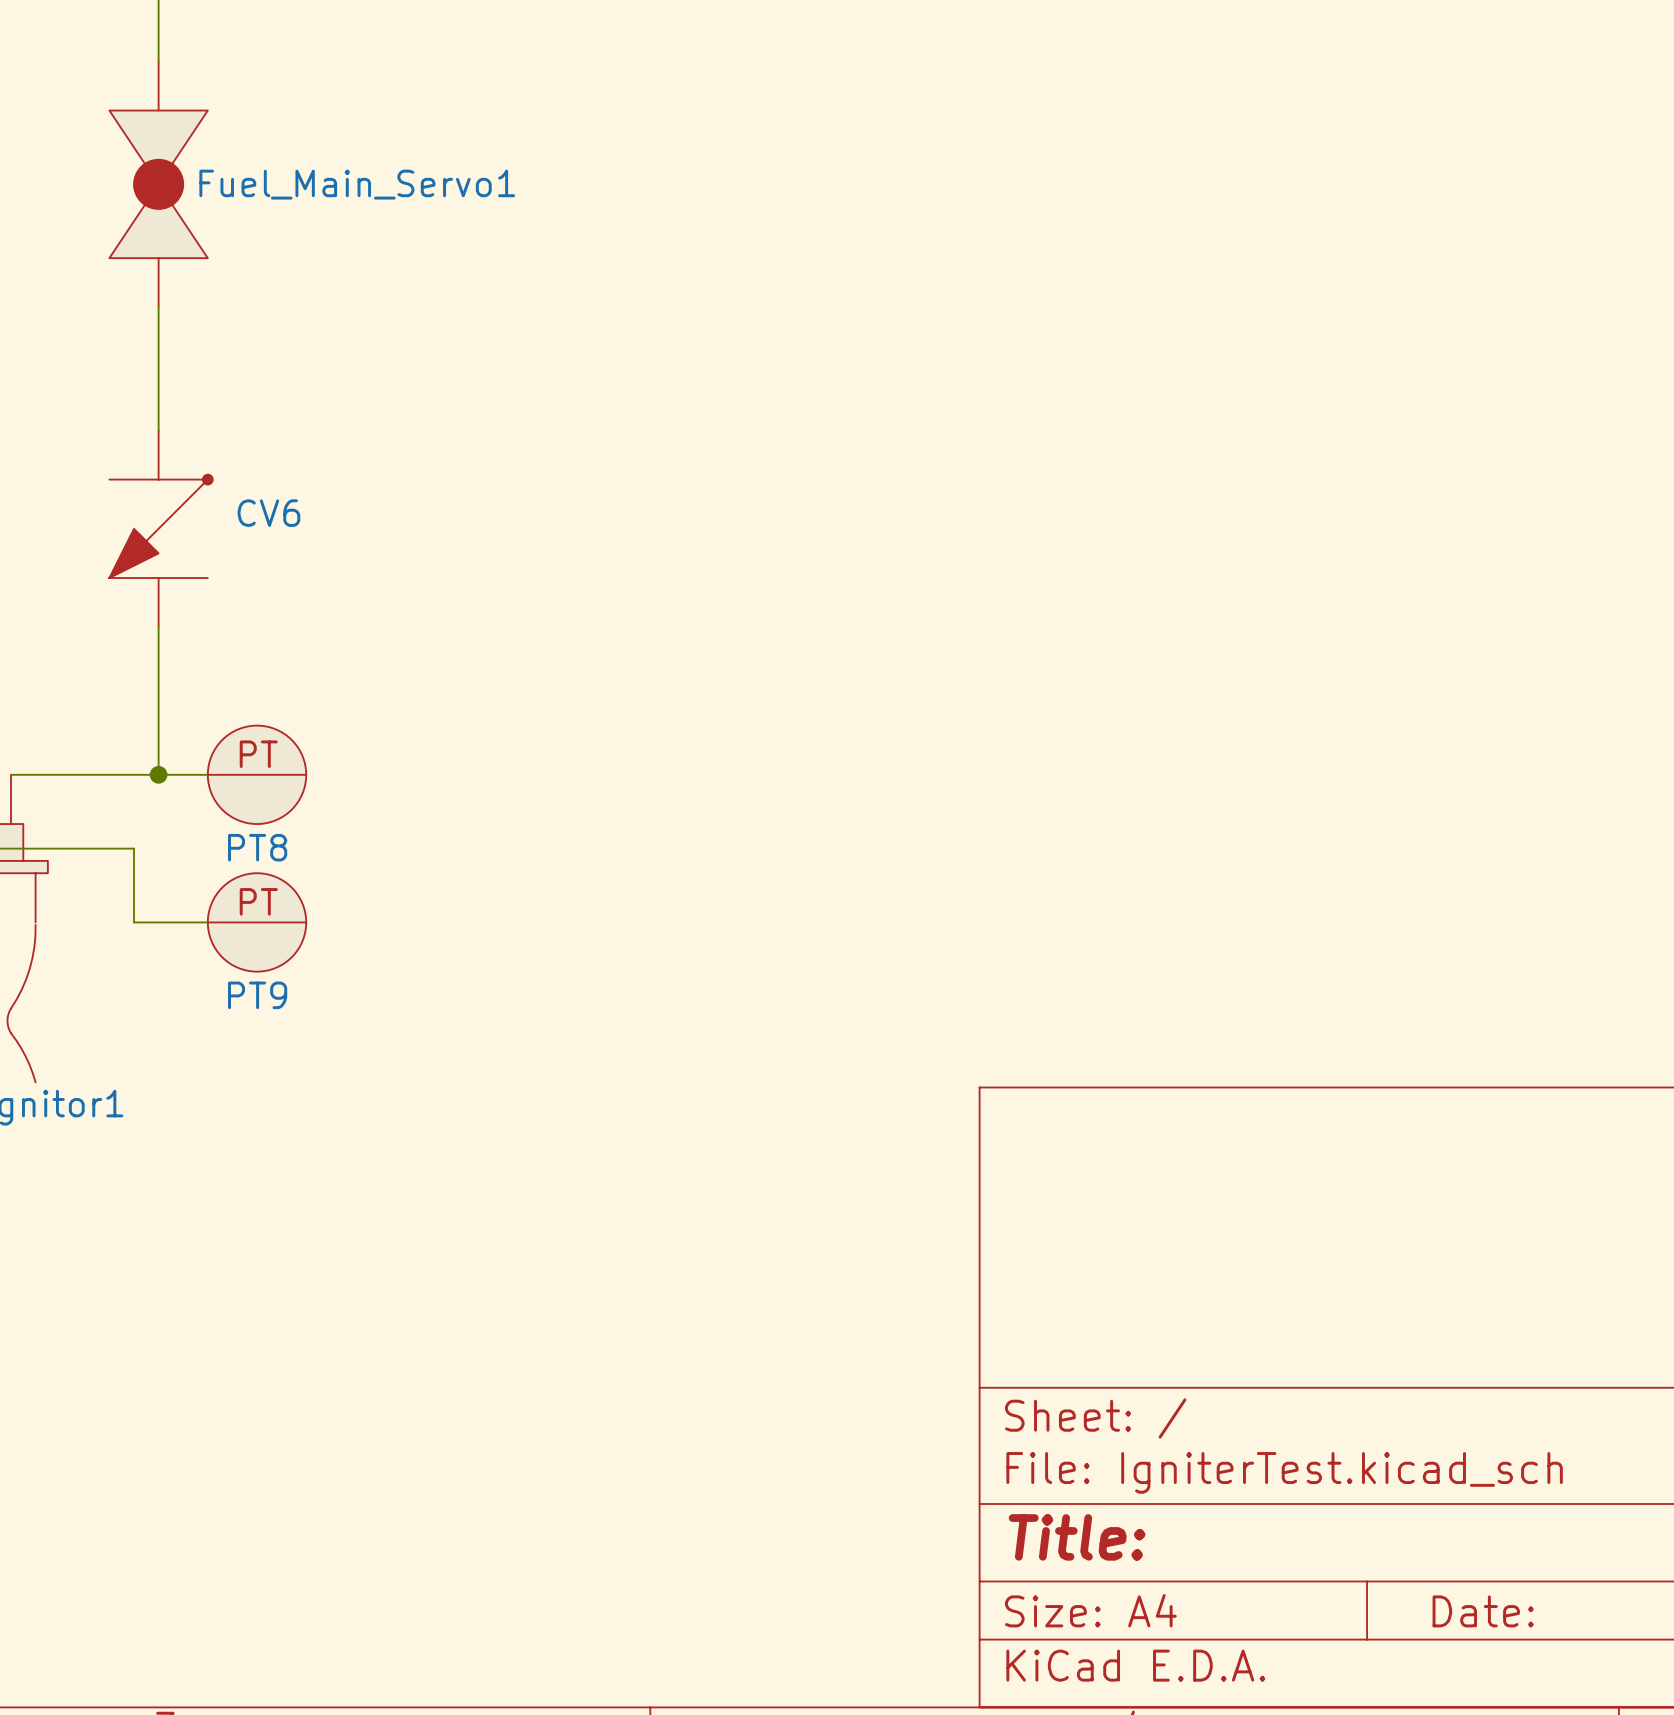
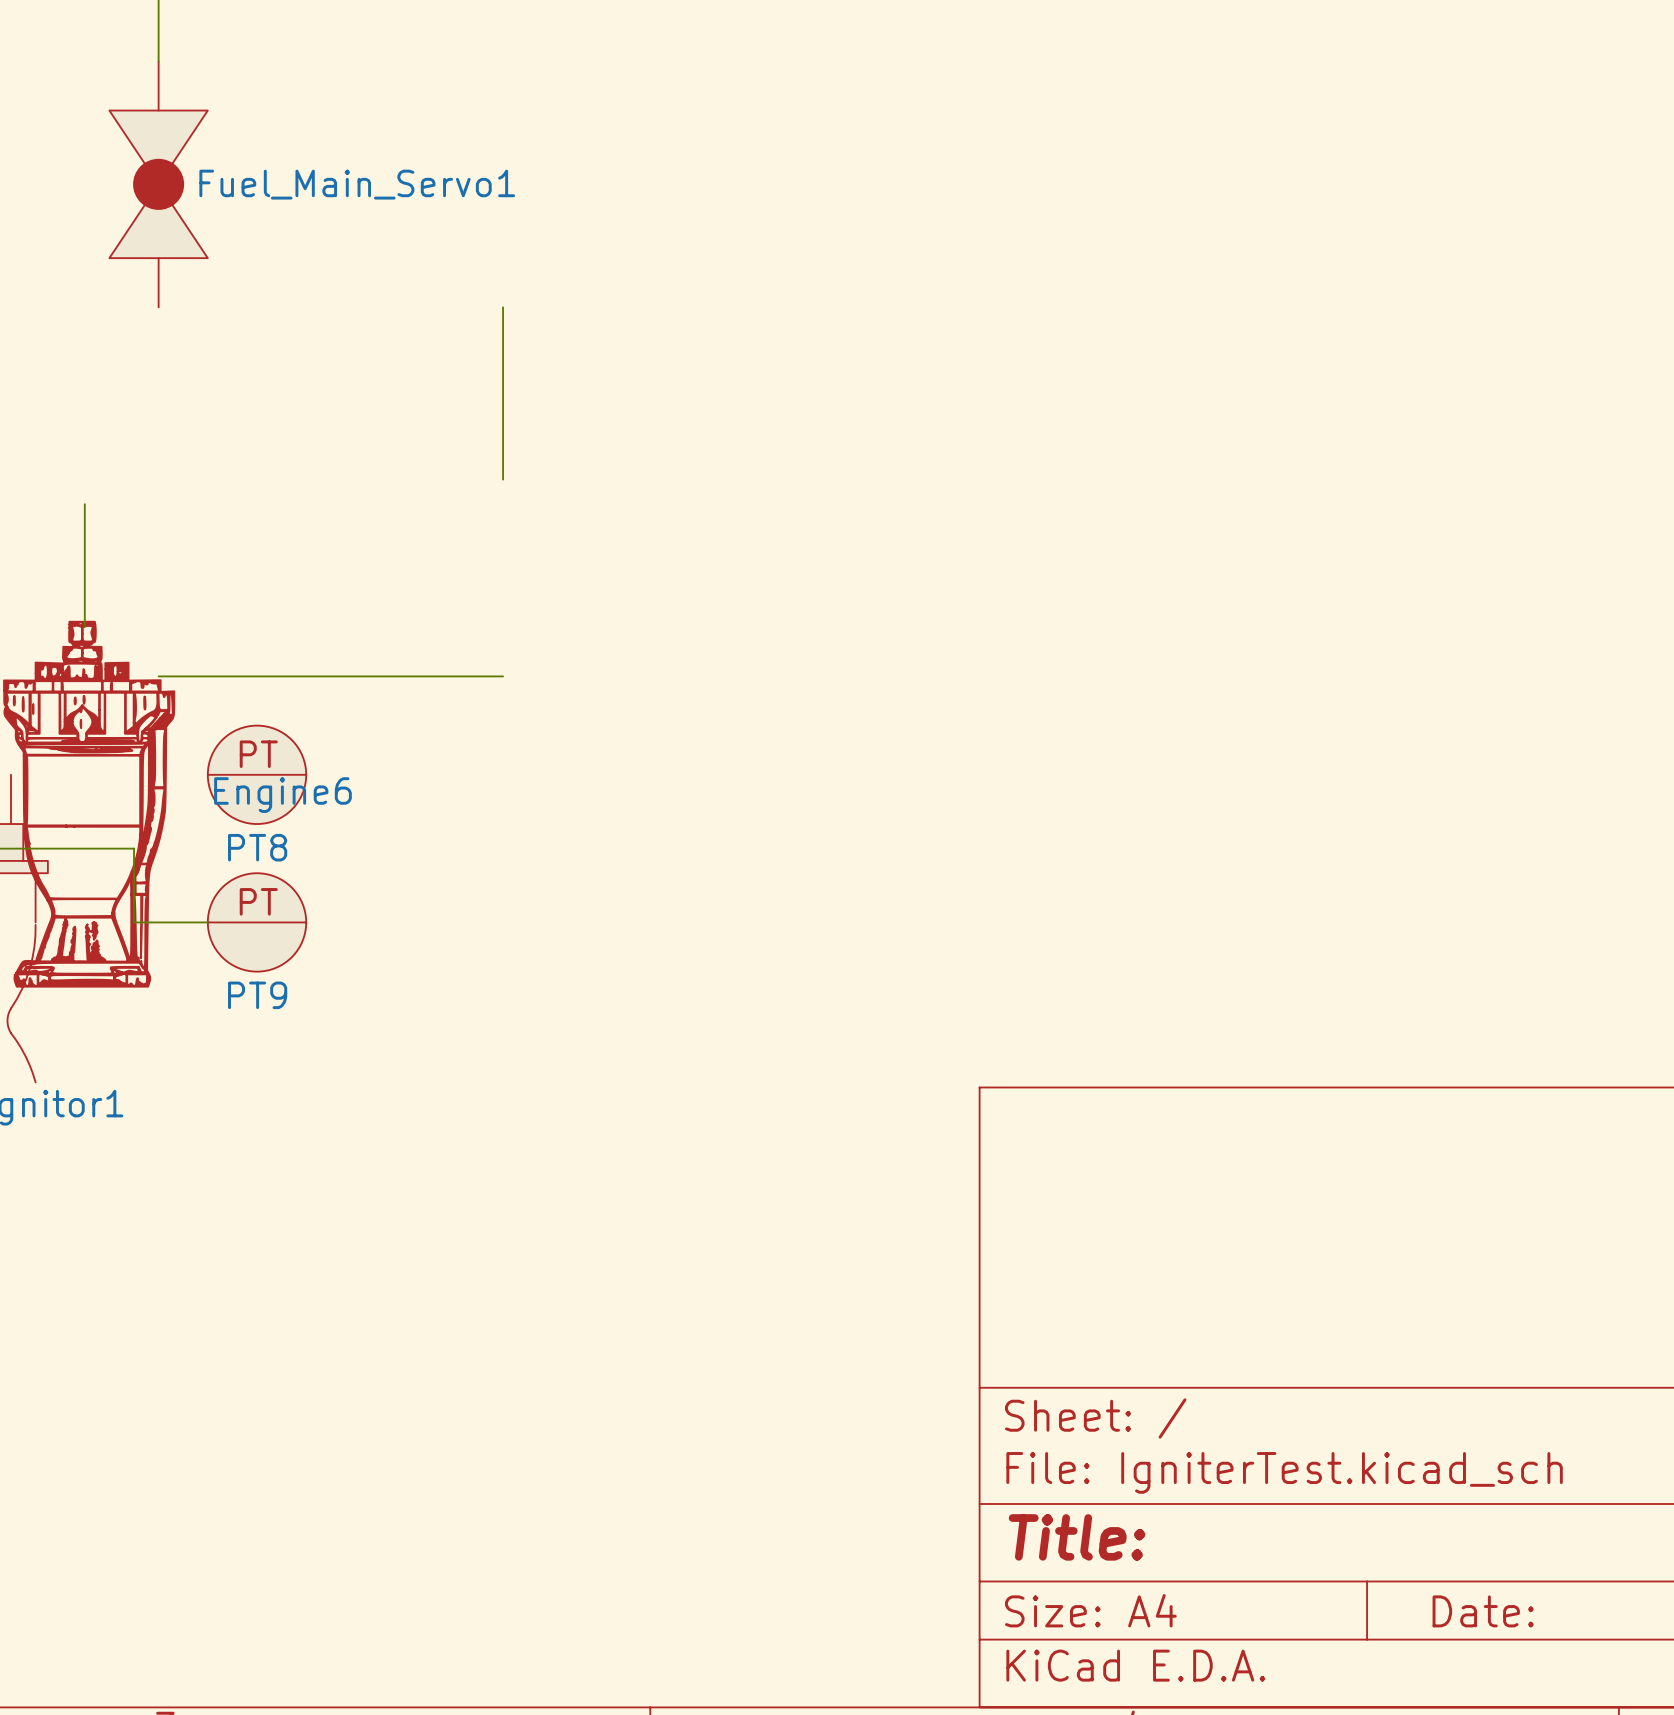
wire: (158, 307) (158, 430) -> (84, 504) (84, 627)
wire: none -> (503, 307) (503, 479)
CV6: (161, 528) -> none
wire: (158, 627) (158, 774) -> none
wire: none -> (158, 676) (503, 676)
wire: (10, 774) (207, 774) -> none
junction: (158, 774) -> none
Engine6: none -> (89, 804)

